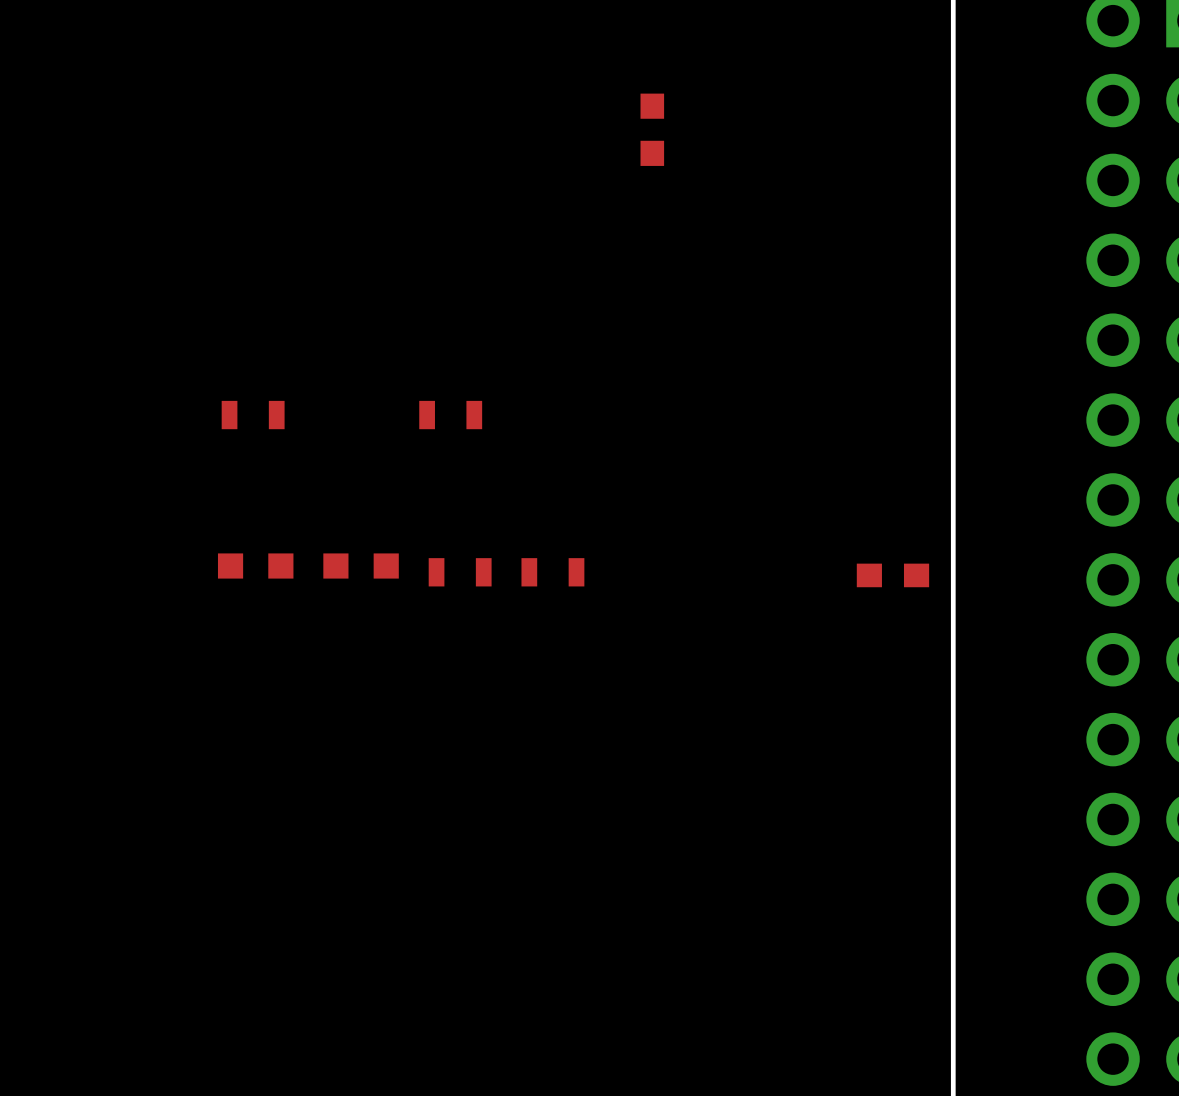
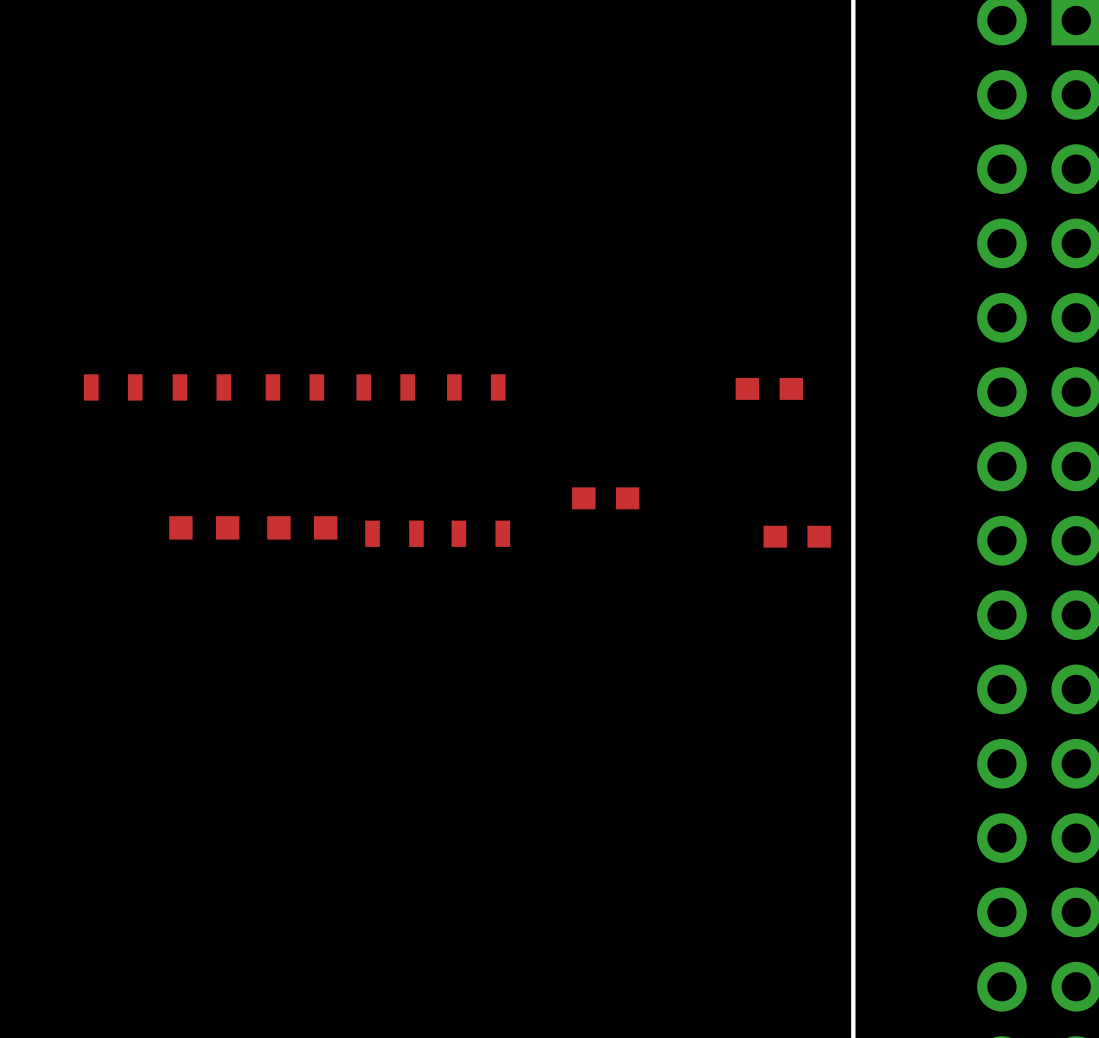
part: (652, 129) -> none
part: none -> (113, 387)
part: none -> (294, 387)
part: none -> (476, 387)
part: none -> (769, 388)
part: none -> (605, 498)

